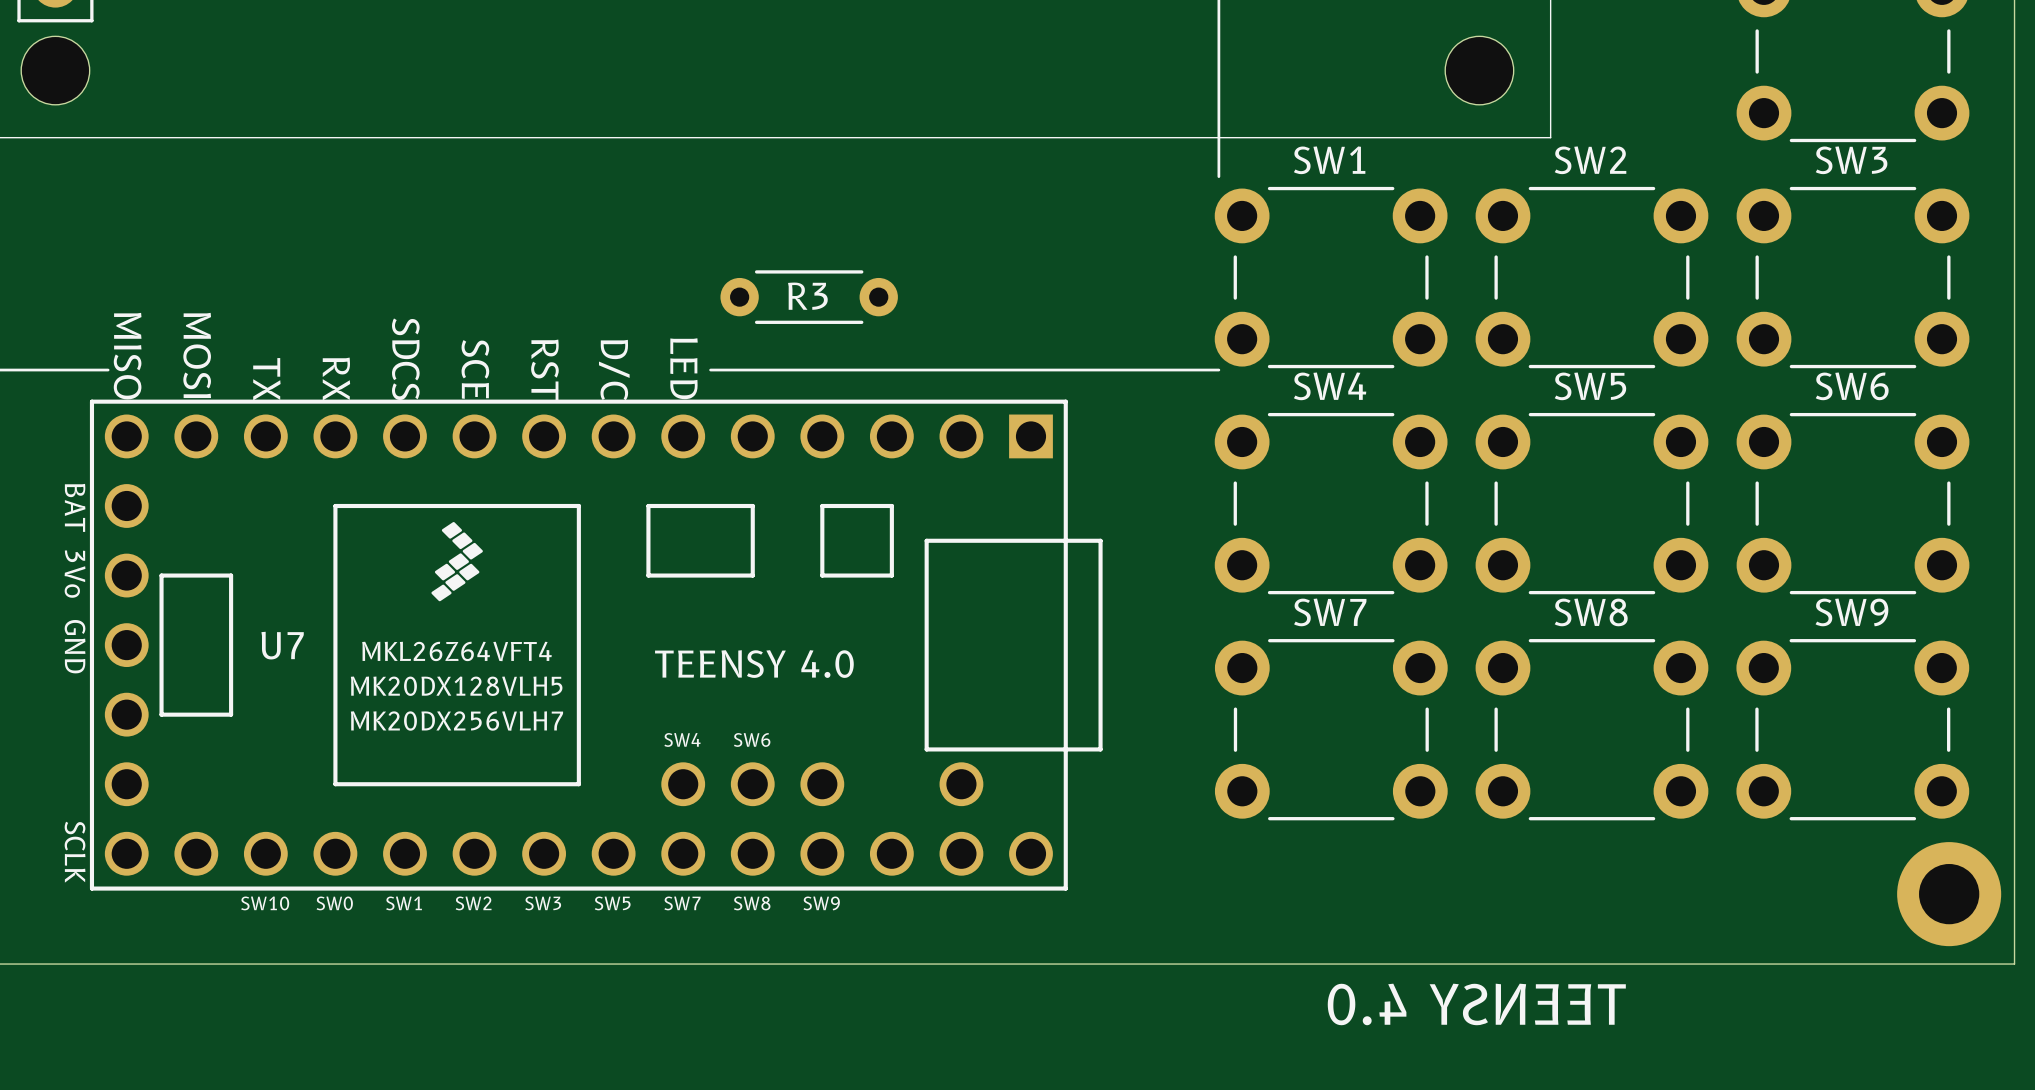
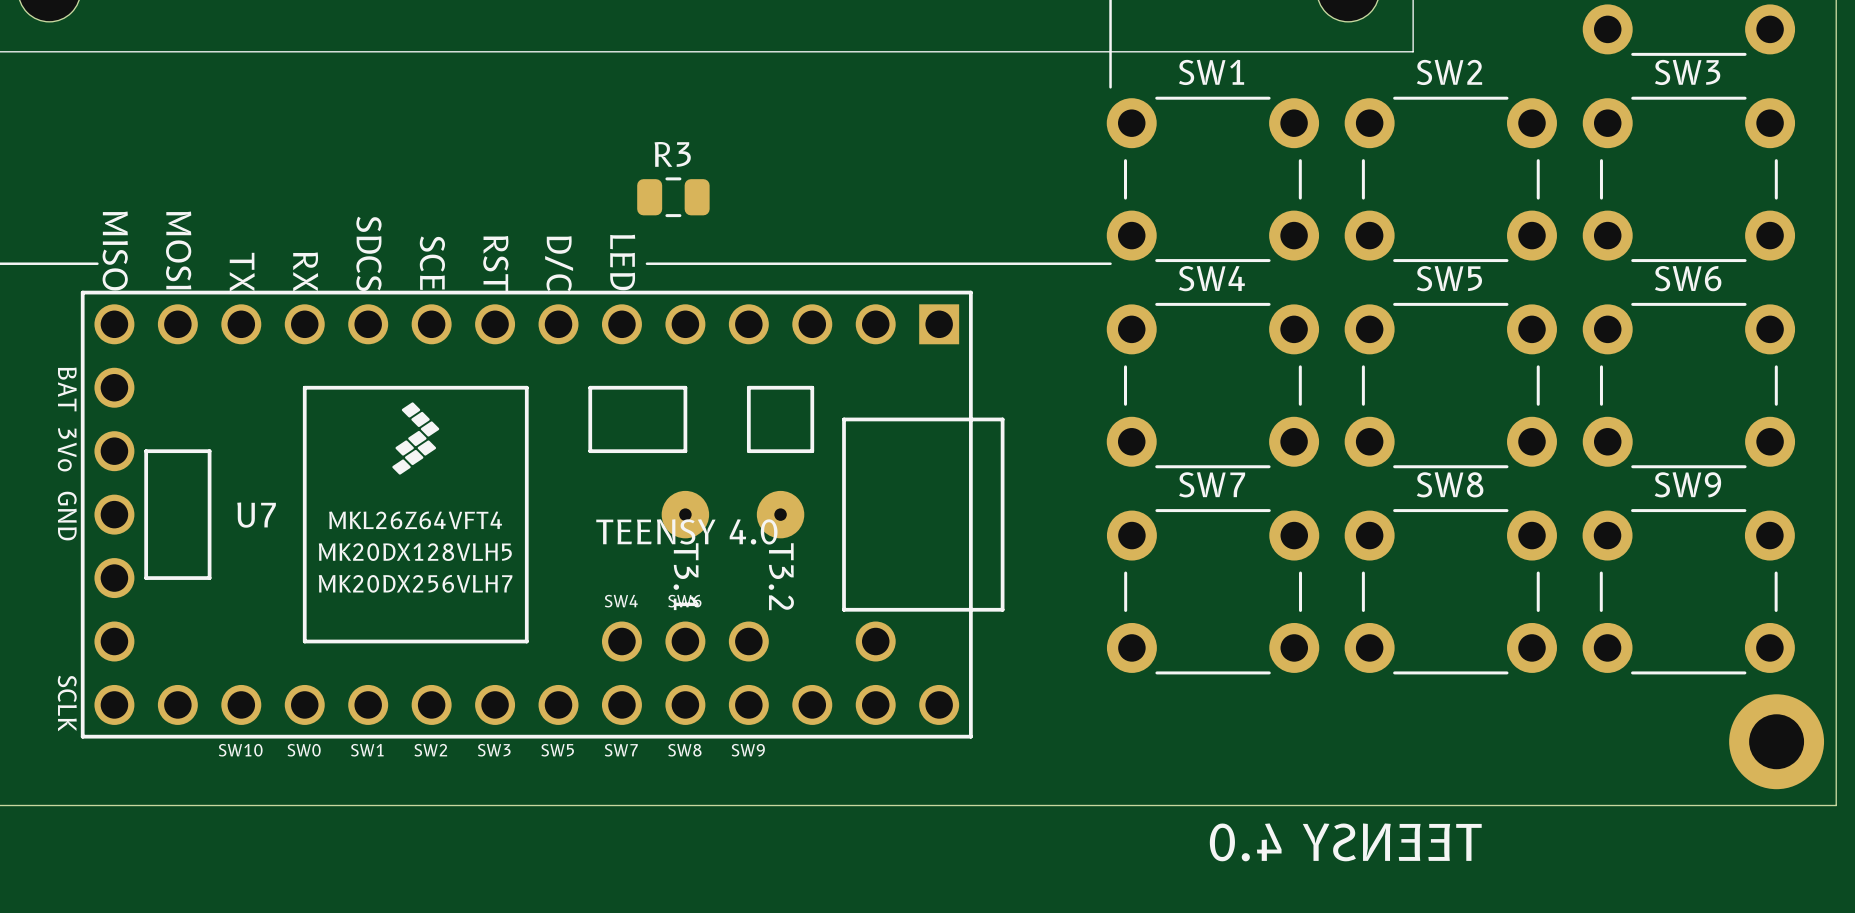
R3 footprint: [720, 270, 898, 324] -> [637, 177, 710, 218]
U7 footprint: [89, 399, 1103, 891] -> [80, 290, 1005, 739]

